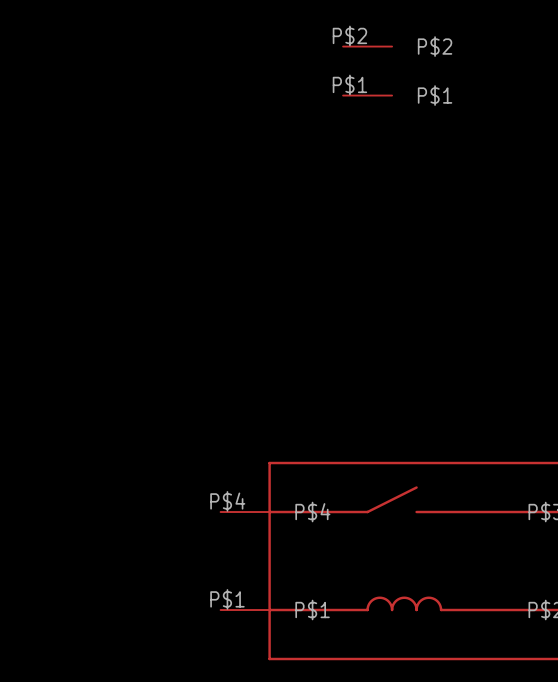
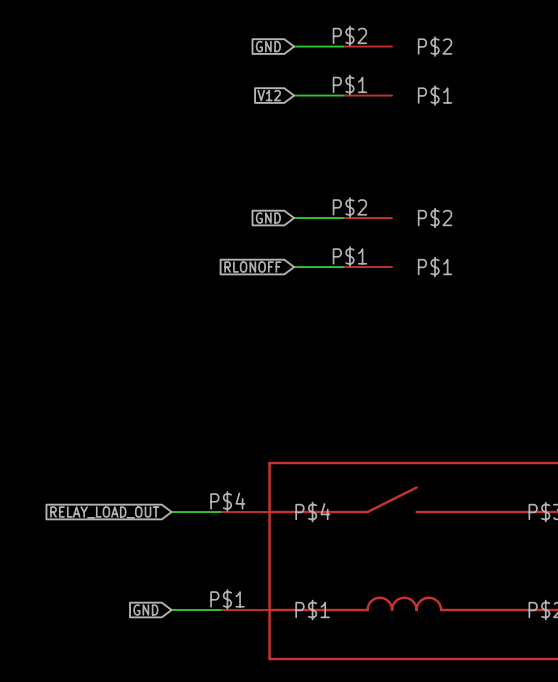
global label: none -> GND (268, 46)
wire: none -> (294, 46) (343, 46)
global label: none -> V12 (269, 95)
wire: none -> (294, 95) (343, 95)
global label: none -> GND (268, 218)
wire: none -> (294, 218) (343, 218)
part: none -> (367, 242)
global label: none -> RLONOFF (252, 267)
wire: none -> (294, 267) (343, 267)
global label: none -> RELAY_LOAD_OUT (104, 512)
wire: none -> (171, 512) (220, 512)
global label: none -> GND (145, 610)
wire: none -> (171, 610) (220, 610)

